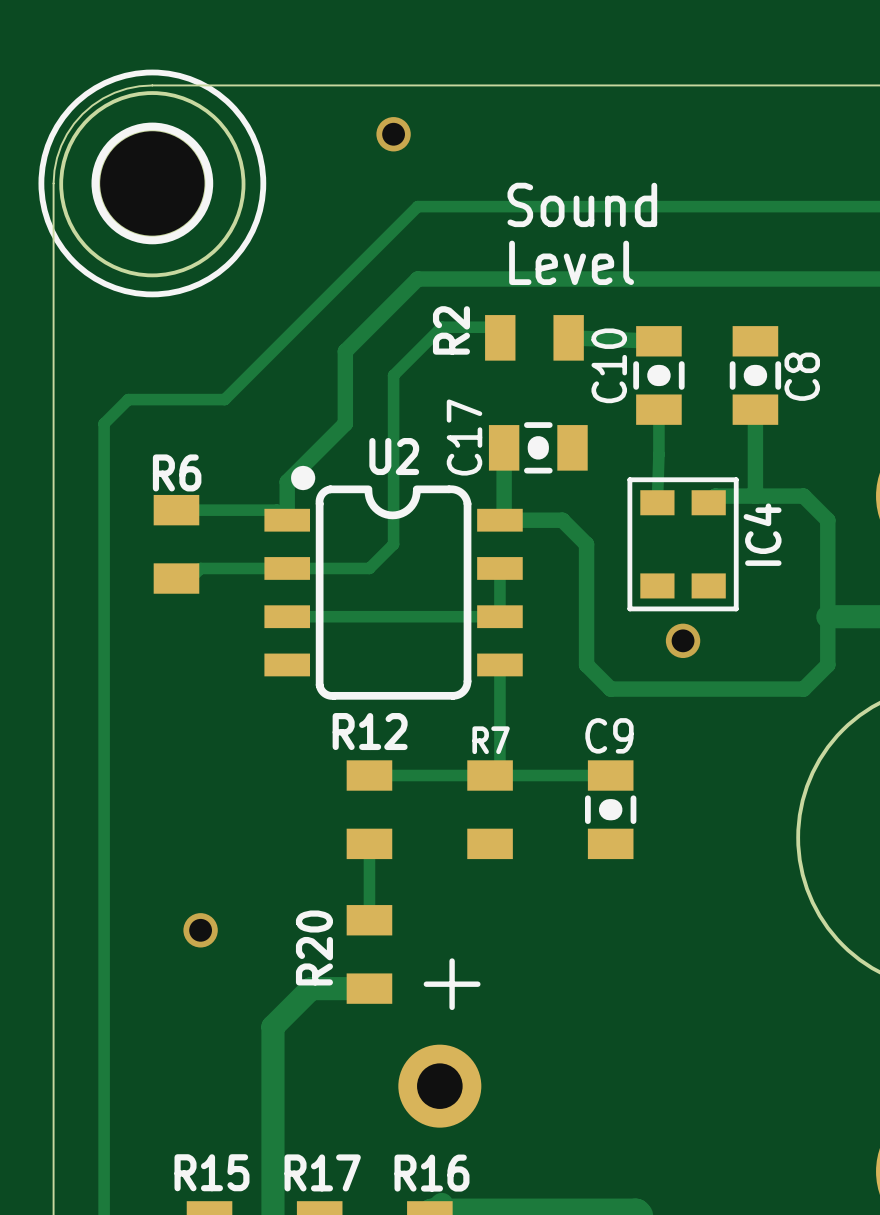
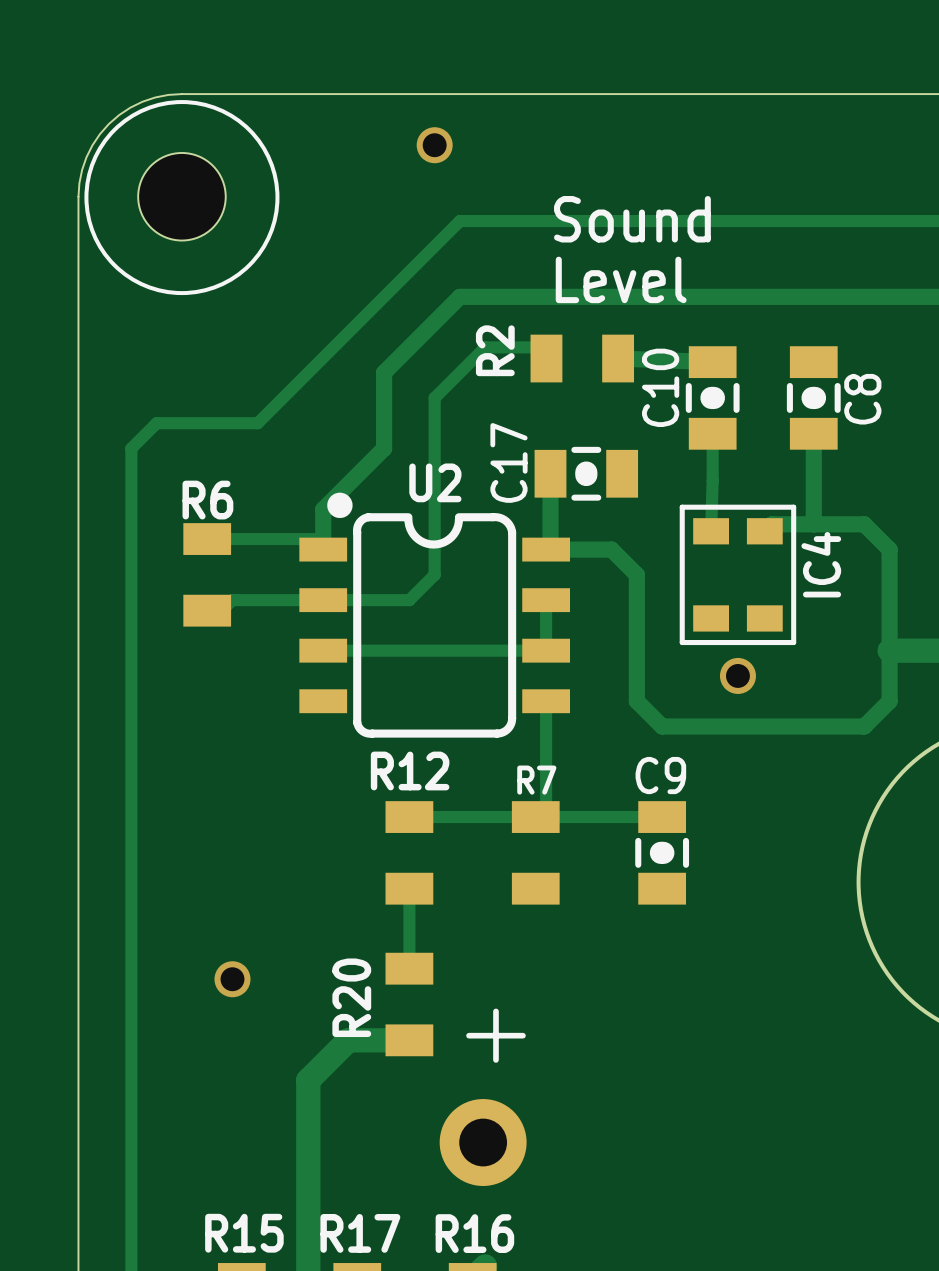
round board edge: [59, 91, 246, 278] -> none
drawing: none -> [84, 100, 280, 296]
part: (152, 183) -> none
hole: none -> (181, 196)

